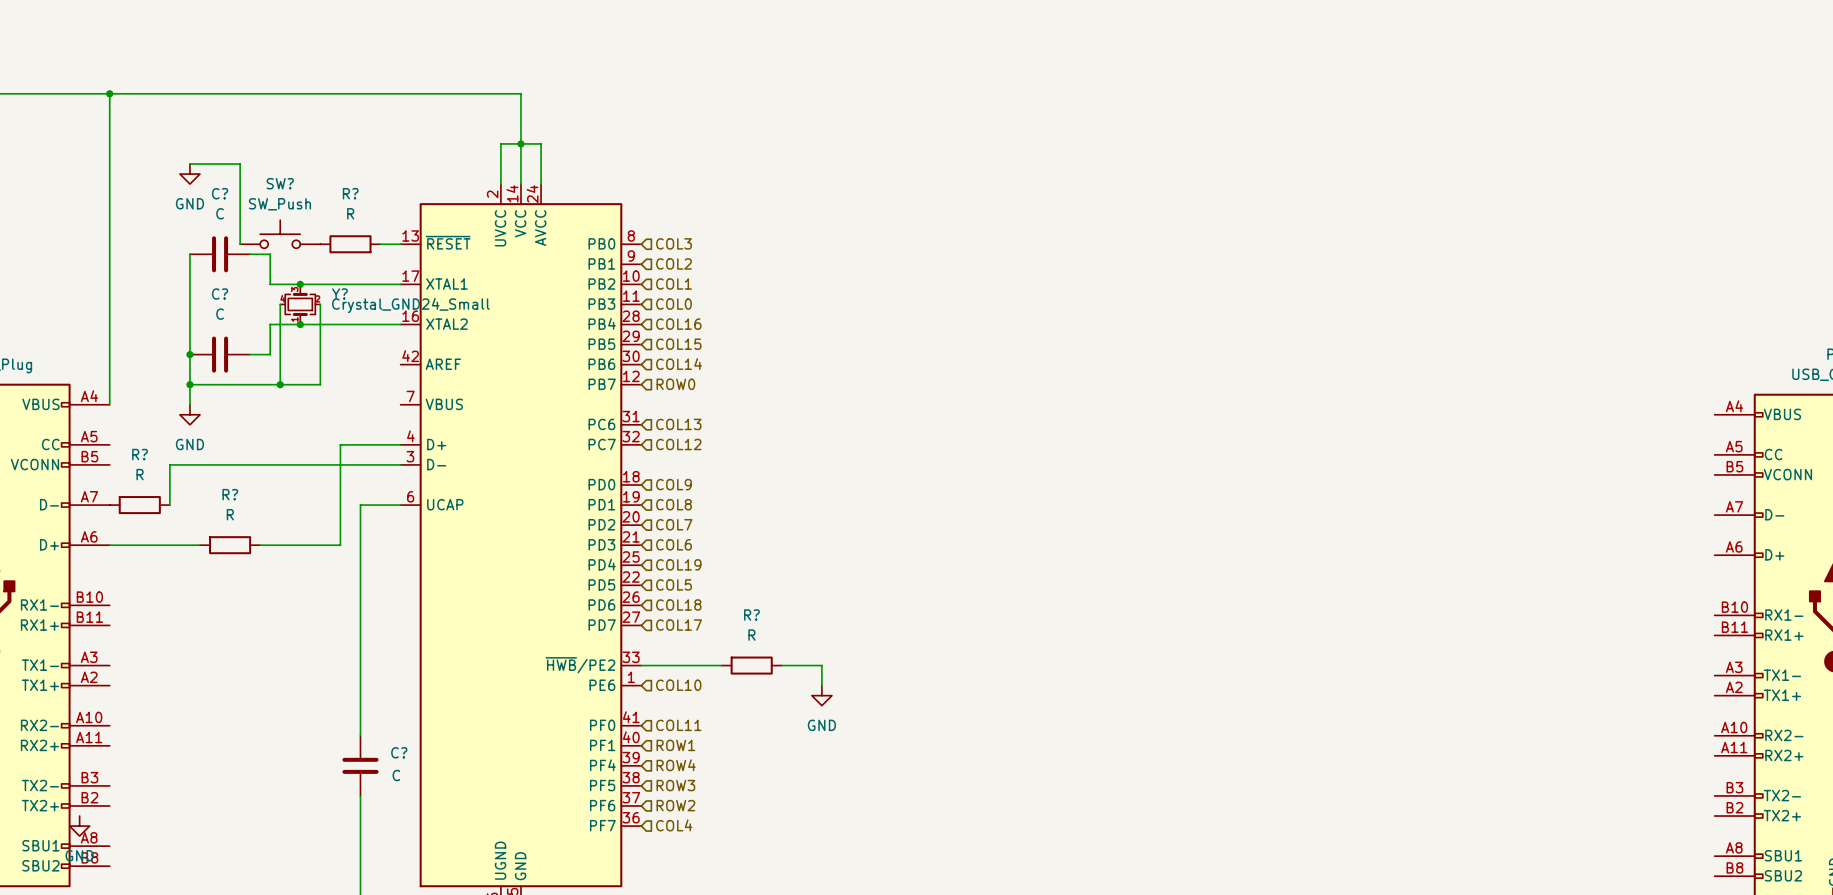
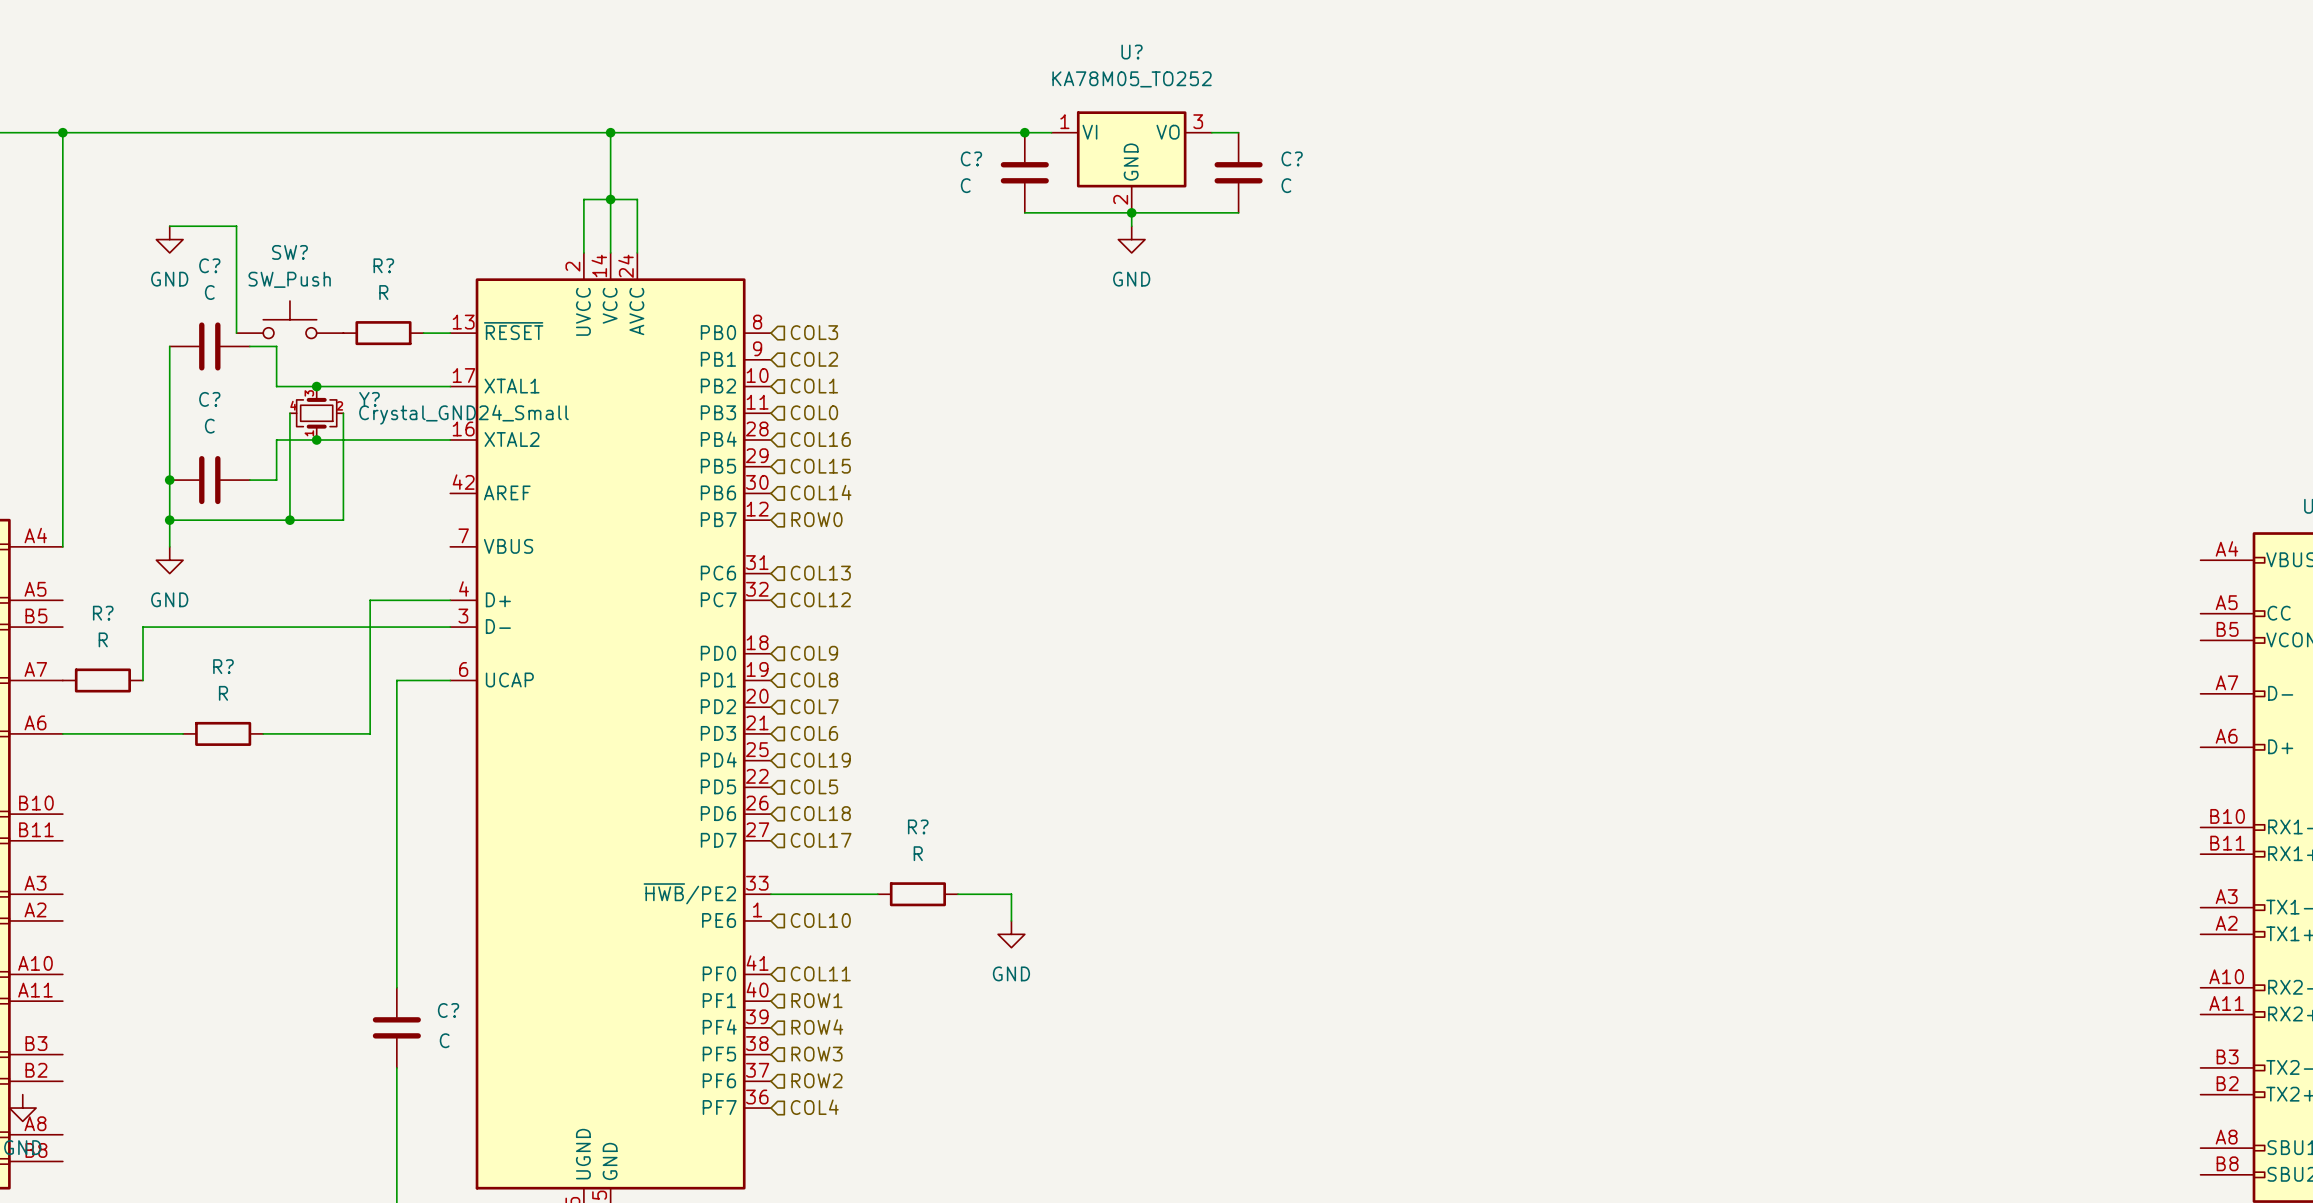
wire: none -> (610, 132) (1051, 132)
junction: none -> (610, 132)
junction: none -> (1024, 132)
wire: none -> (1211, 132) (1238, 132)
U?: none -> KA78M05_TO252 (1131, 162)
C?: none -> C (1024, 172)
C?: none -> C (1238, 172)
wire: none -> (1024, 212) (1238, 212)
wire: none -> (1131, 212) (1131, 226)
junction: none -> (1131, 212)
power symbol: none -> GND (1131, 239)

